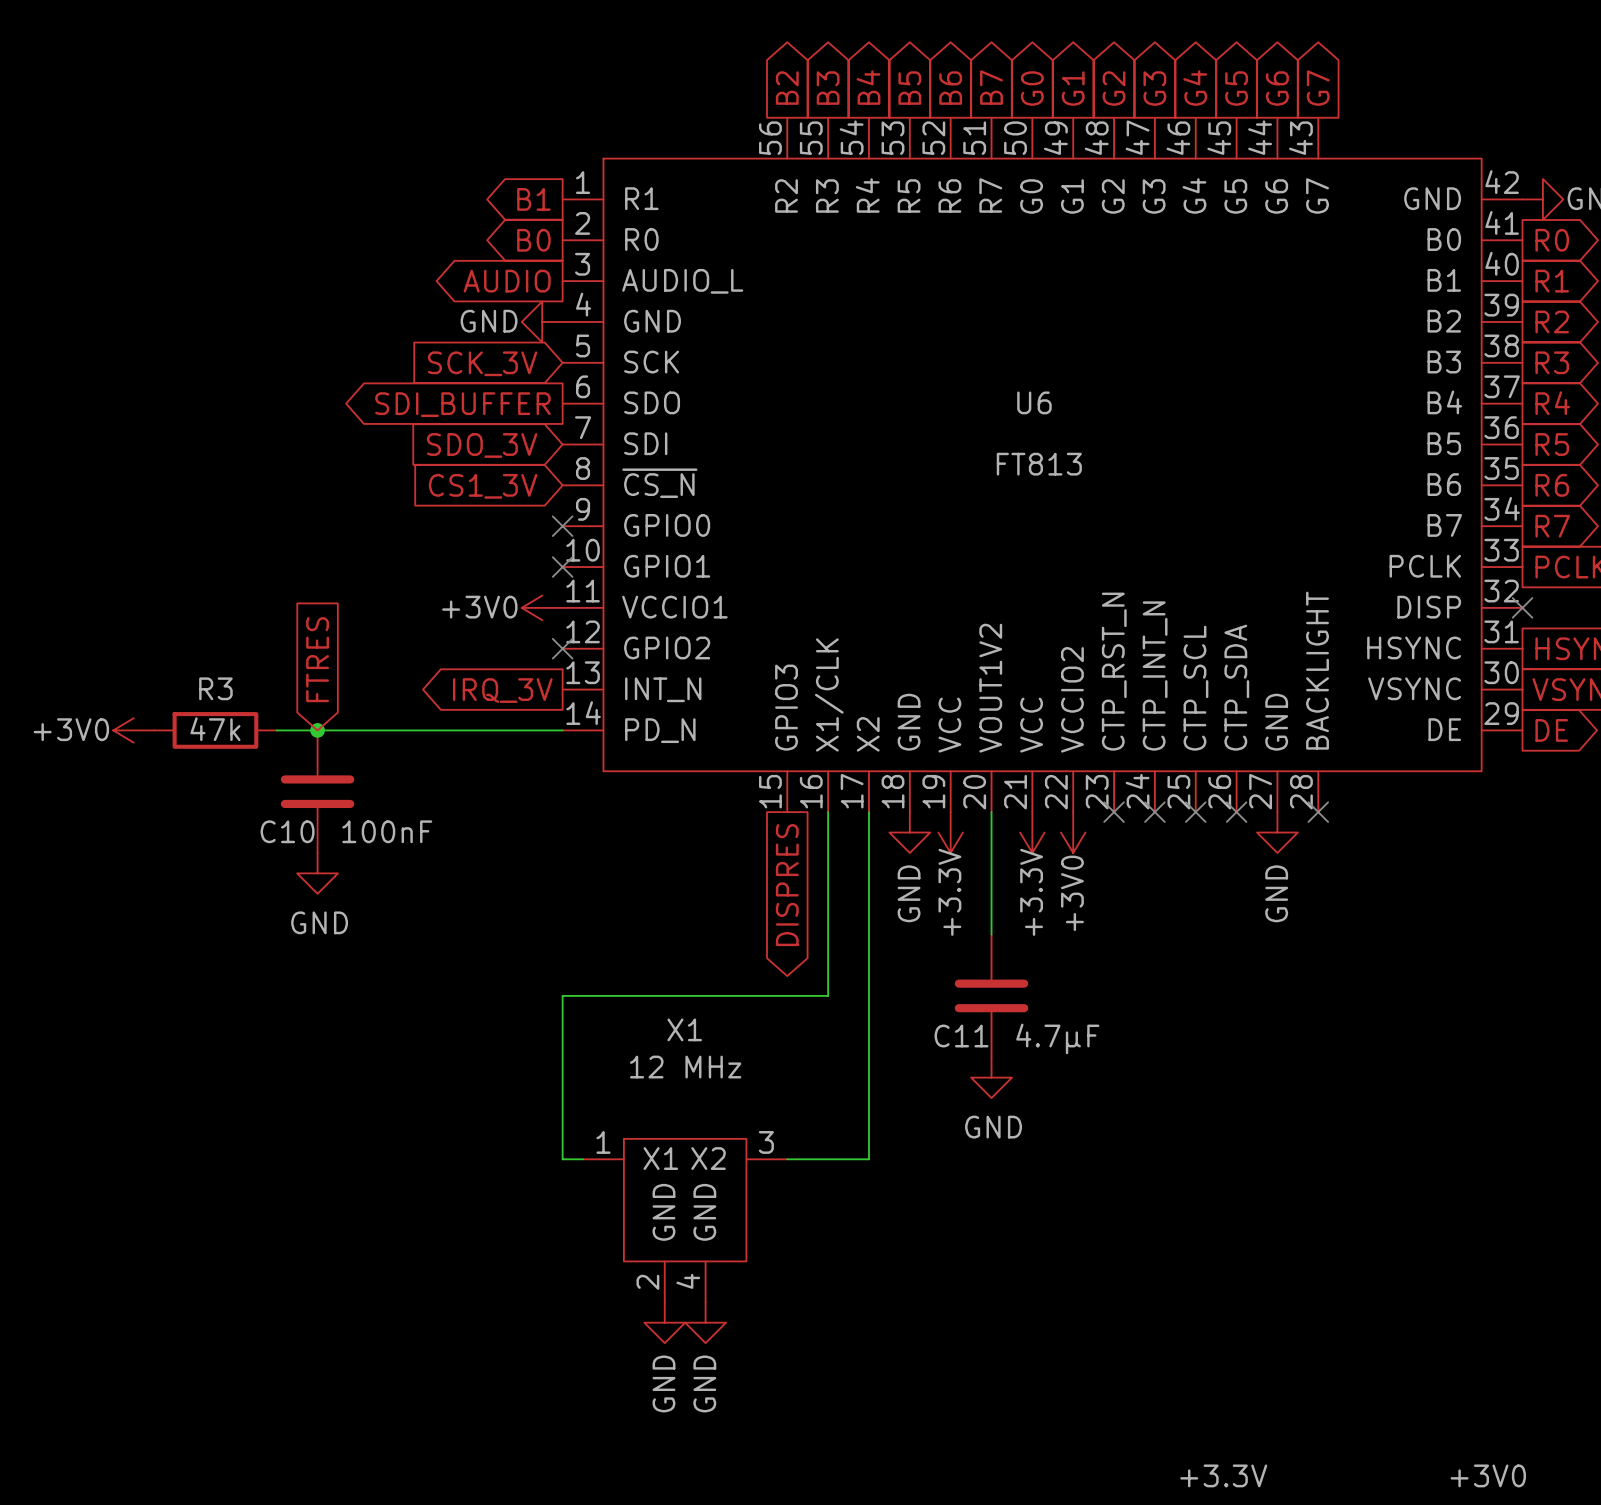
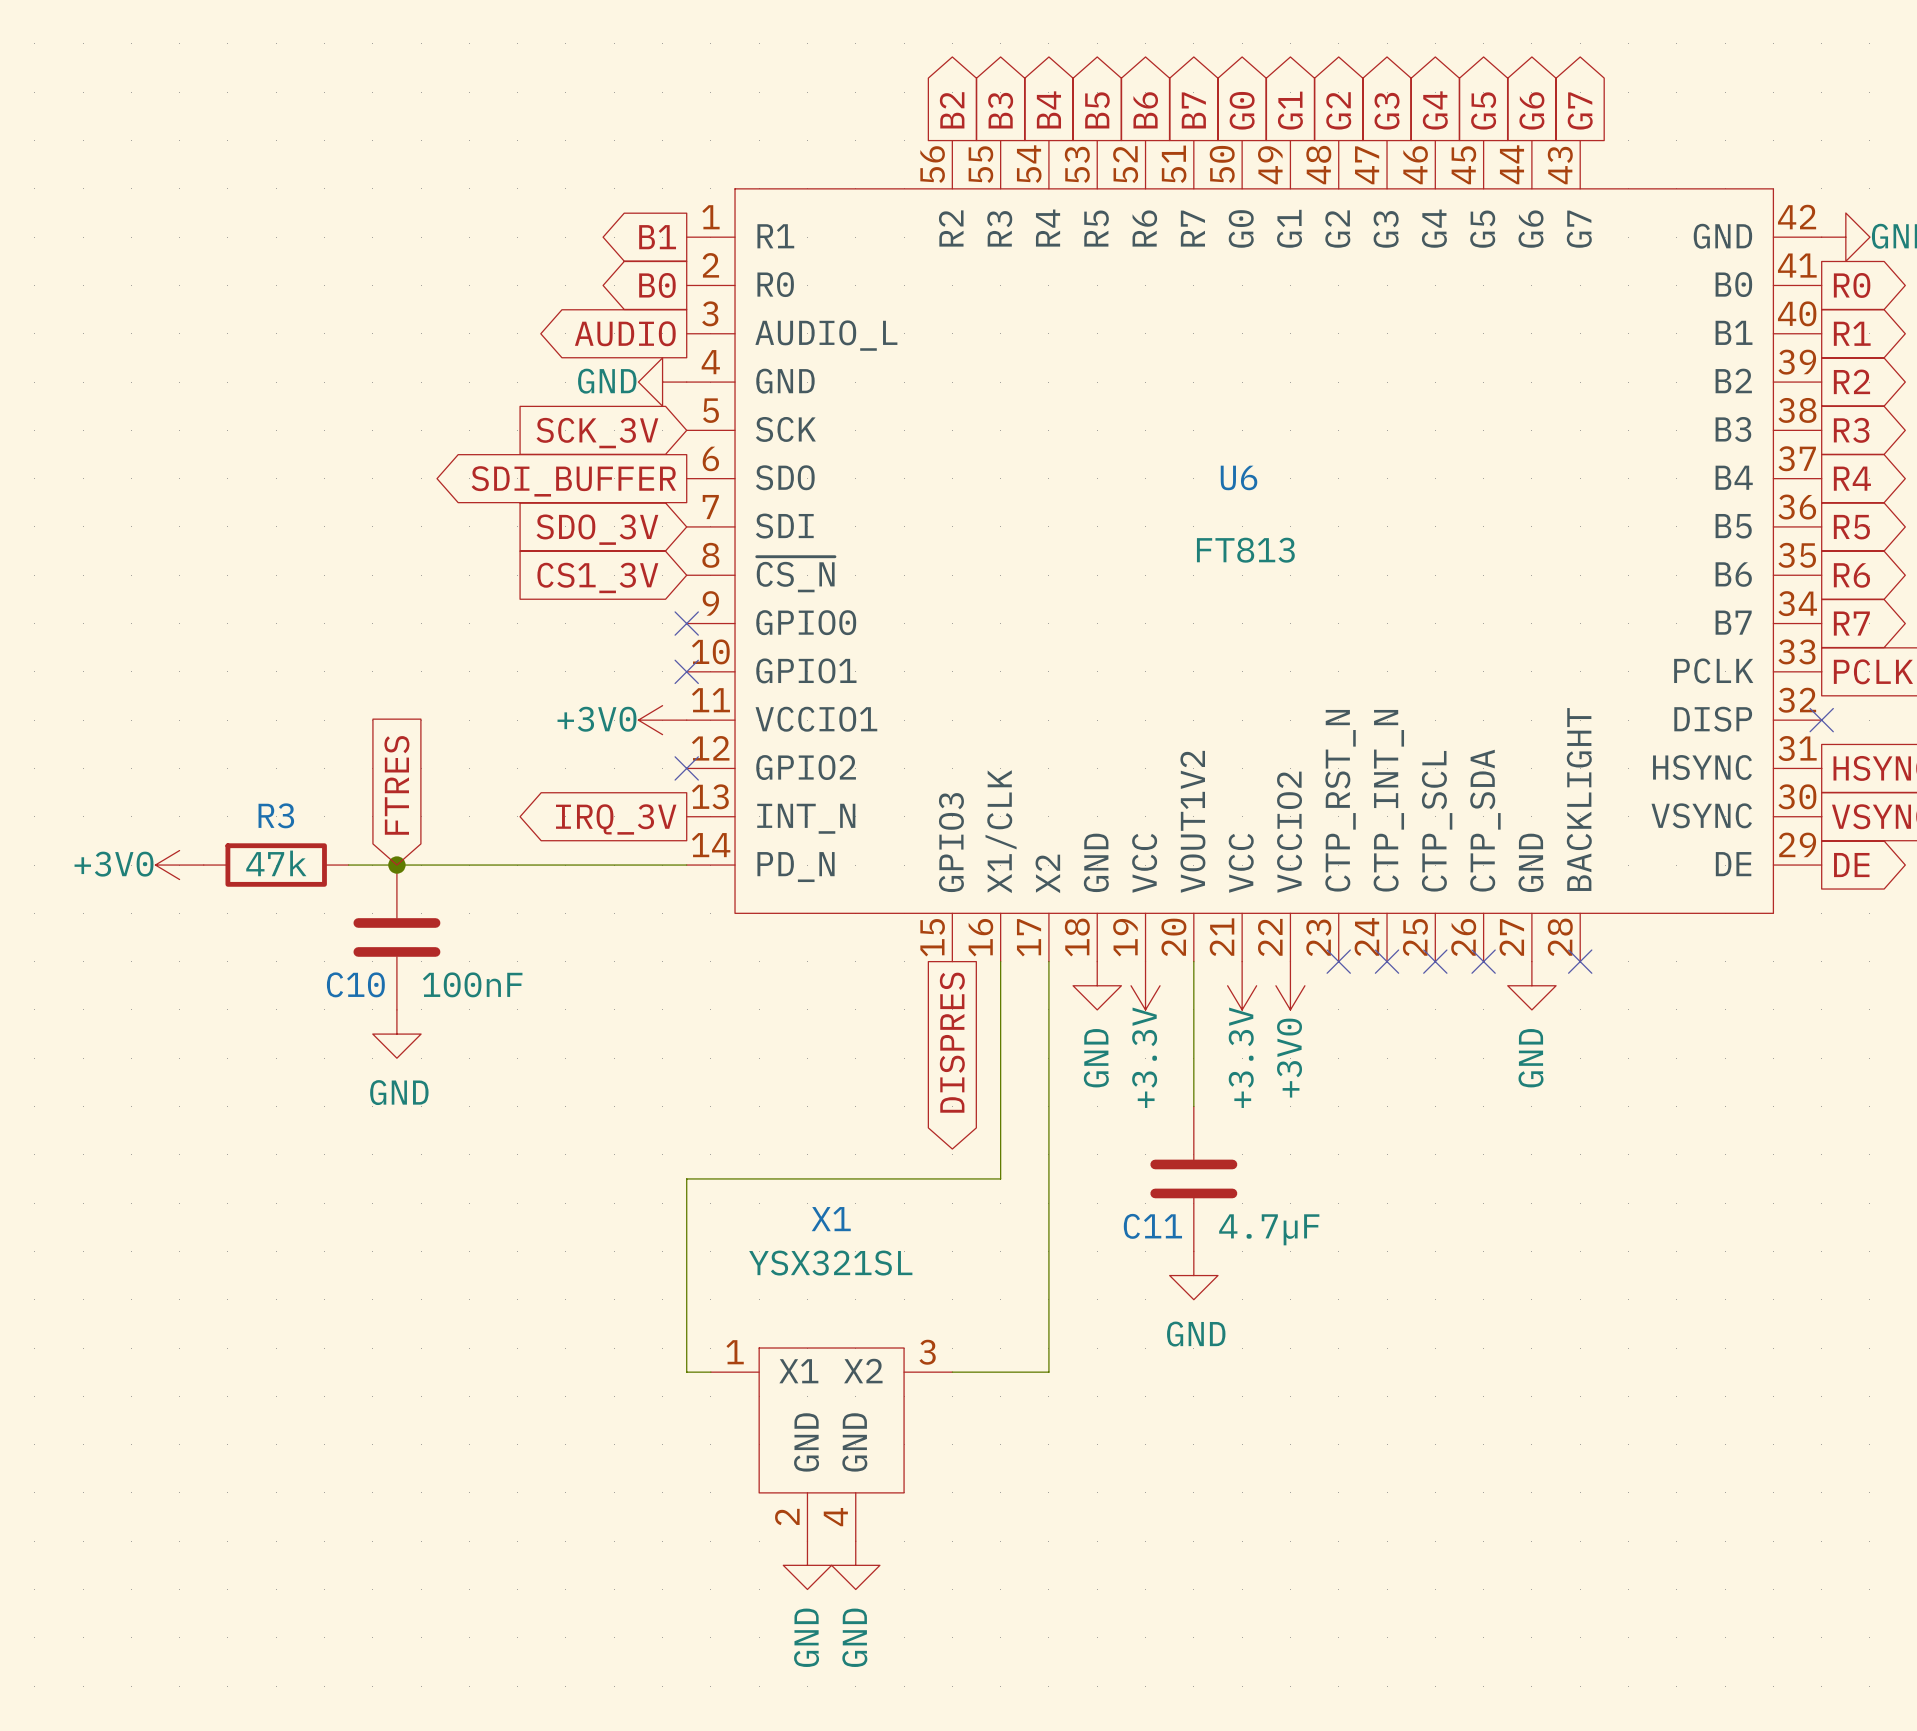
X1 value: 12 MHz (685, 1067) -> YSX321SL (830, 1263)

